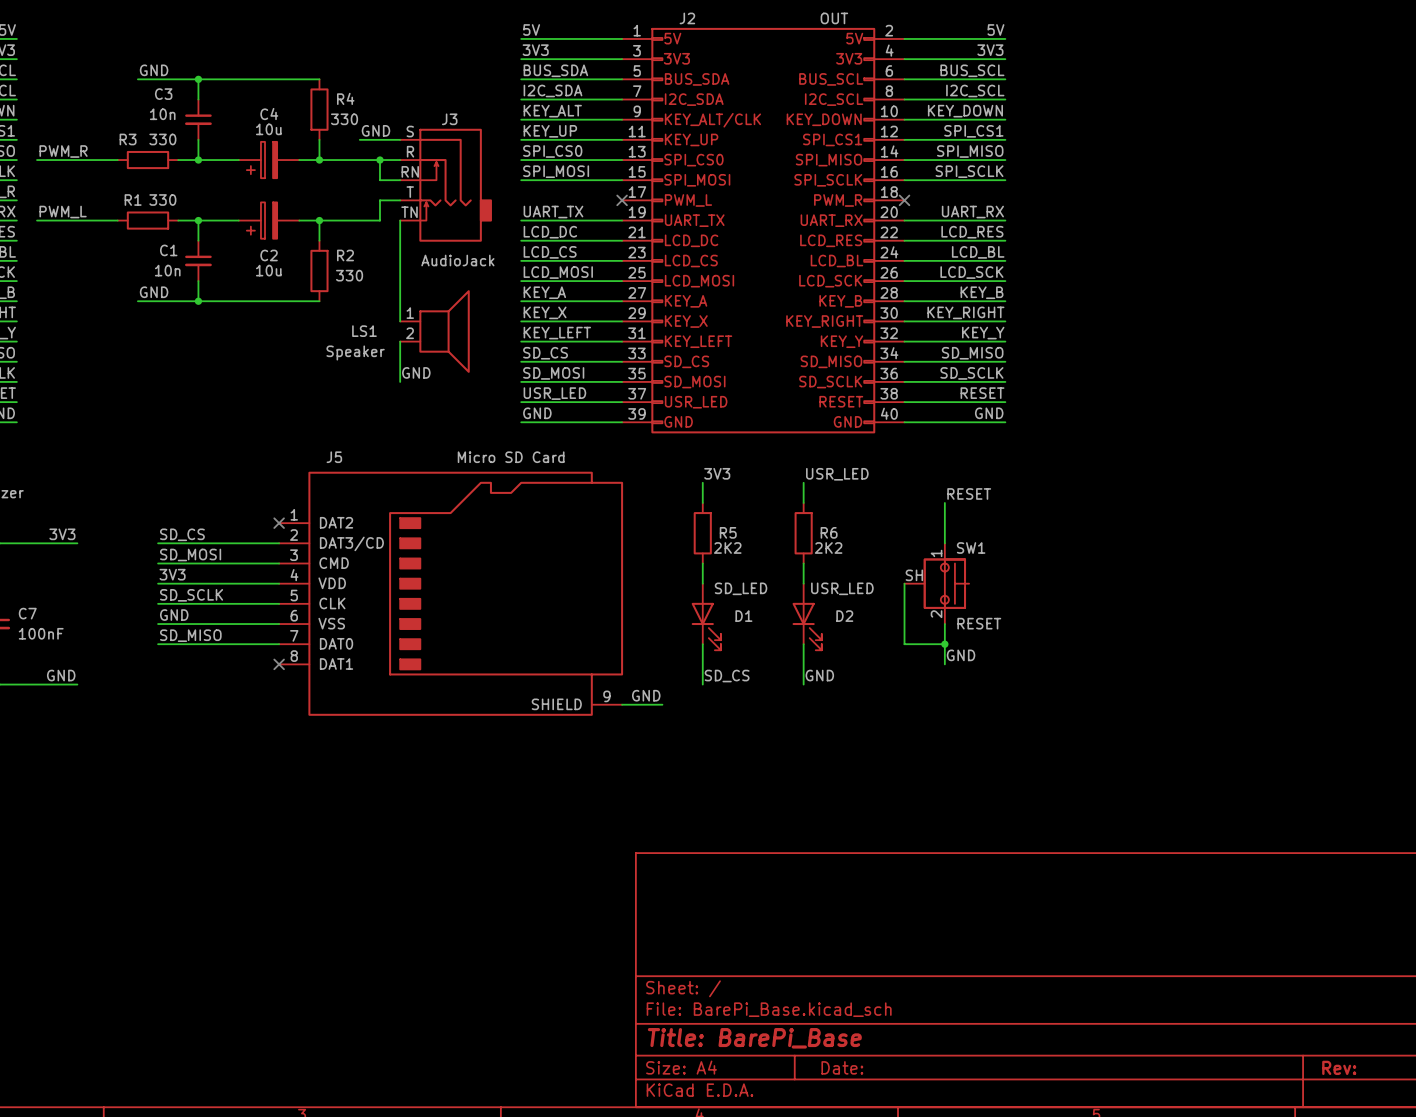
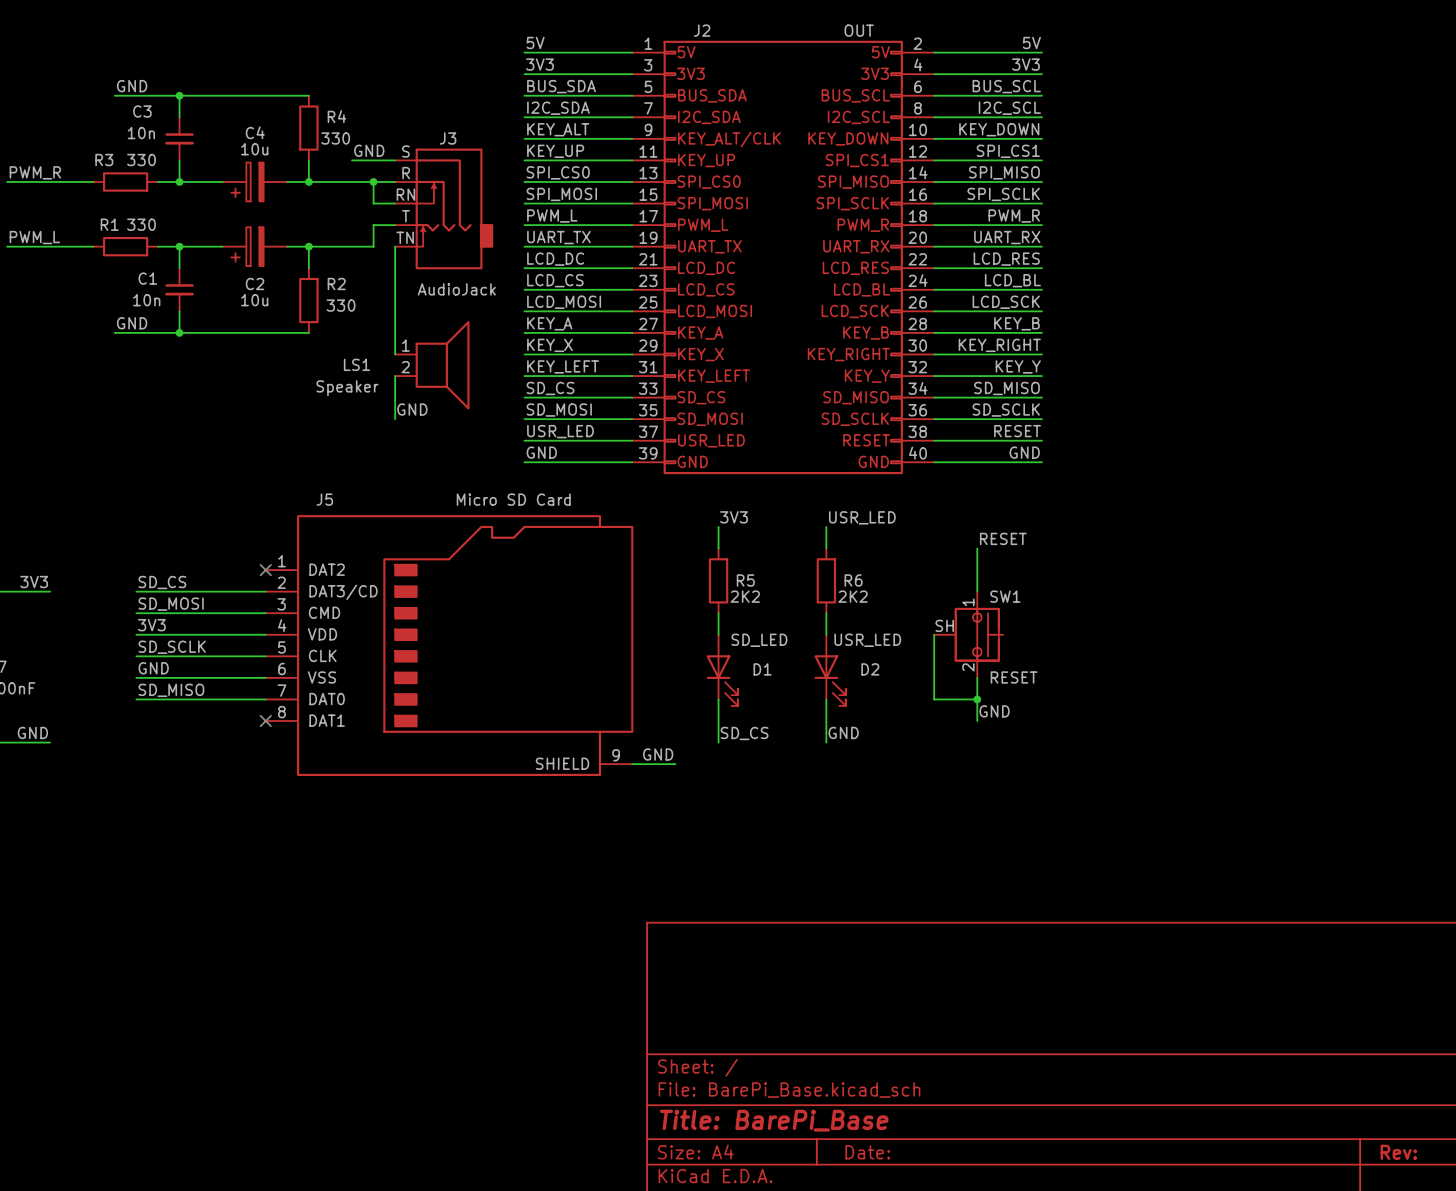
label: none -> PWM_L (552, 215)
label: none -> PWM_R (1014, 215)
wire: none -> (524, 225) (632, 225)
no-connect mark: (622, 200) -> none
wire: none -> (934, 225) (1041, 225)
no-connect mark: (904, 200) -> none

